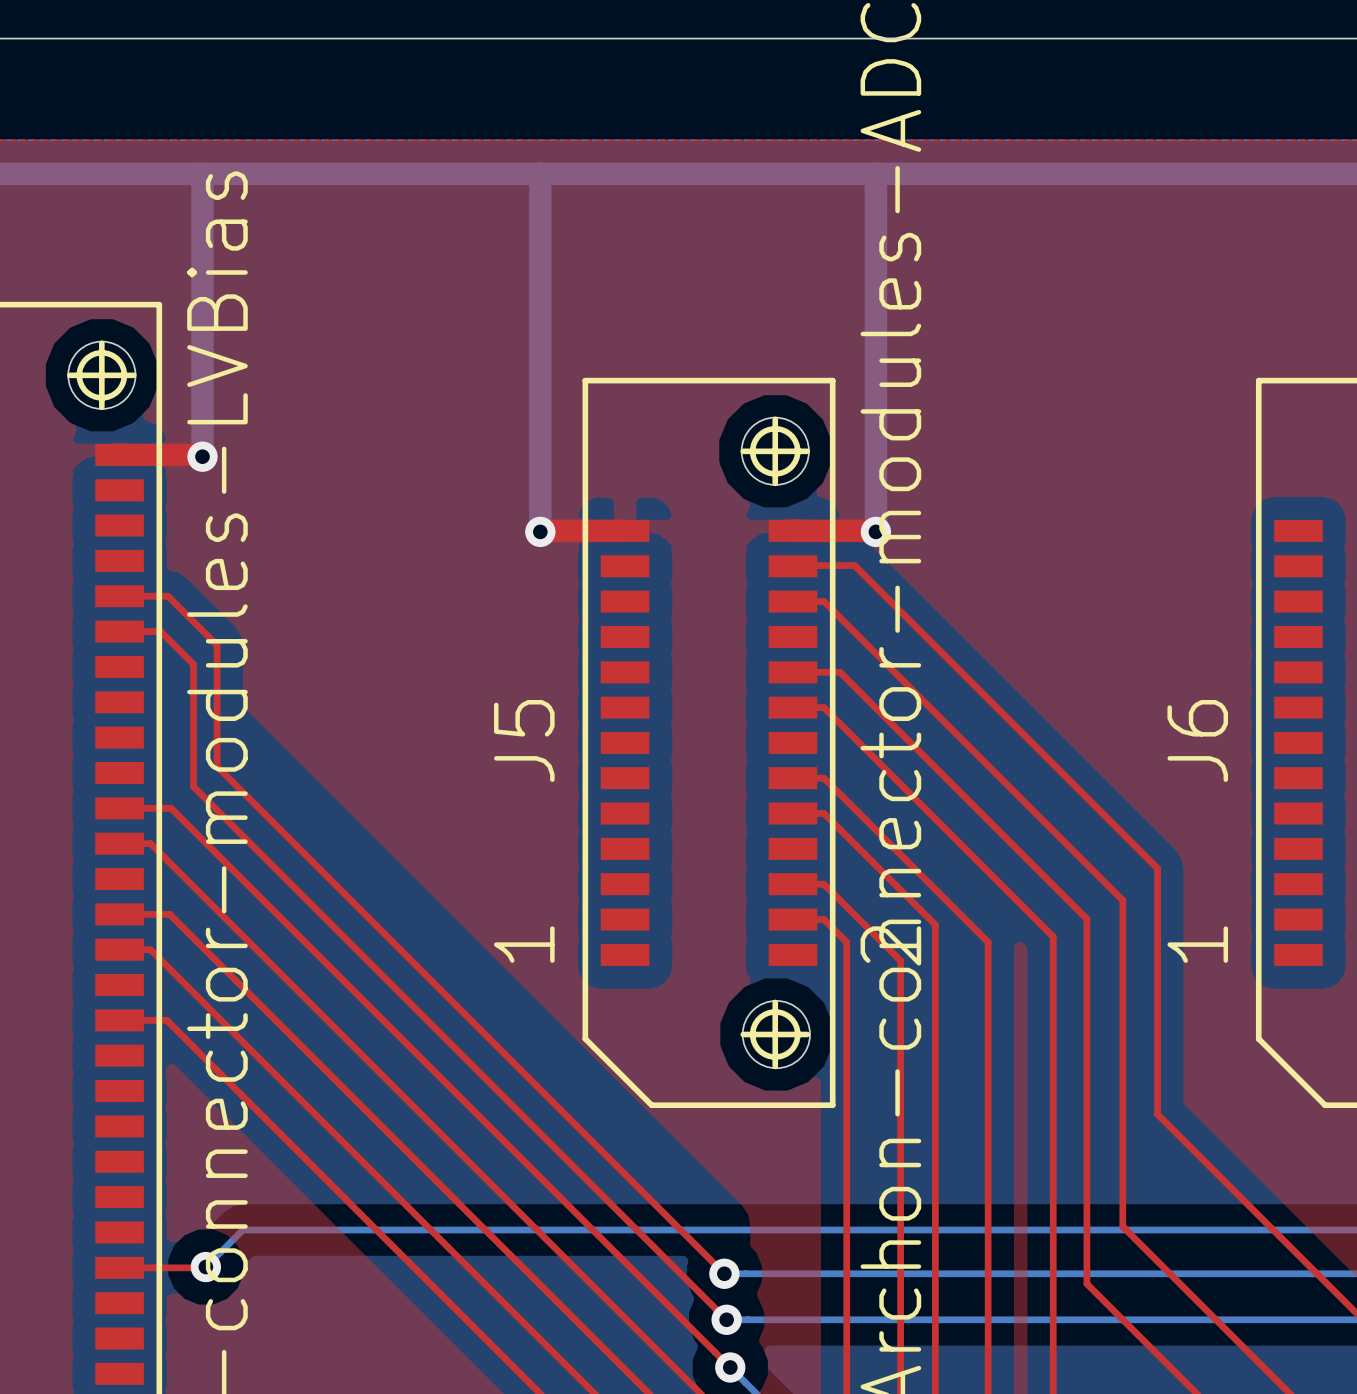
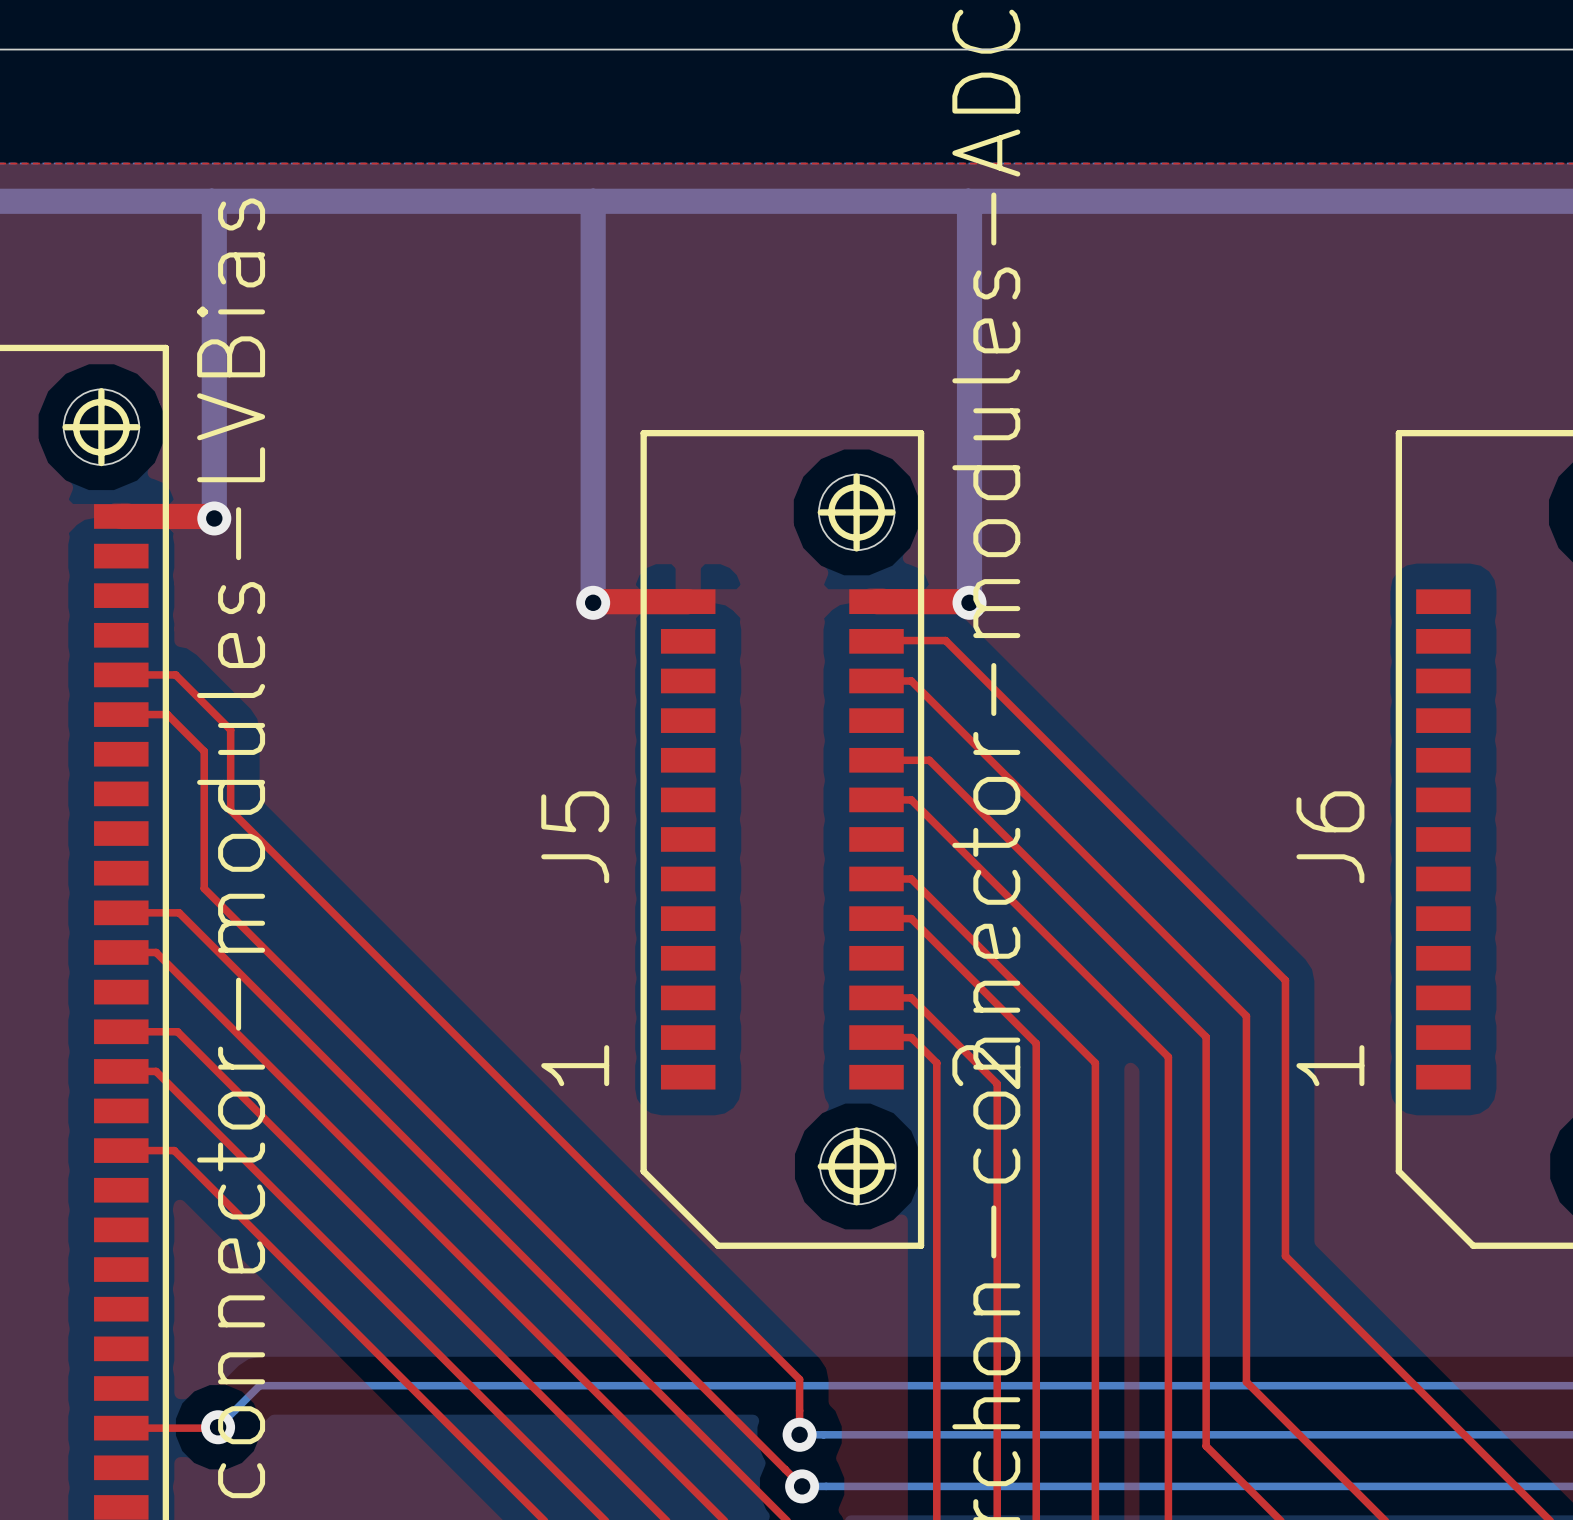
top track: (217, 717) (217, 766) (724, 1273) -> (230, 810) (799, 1379) (799, 1434)

